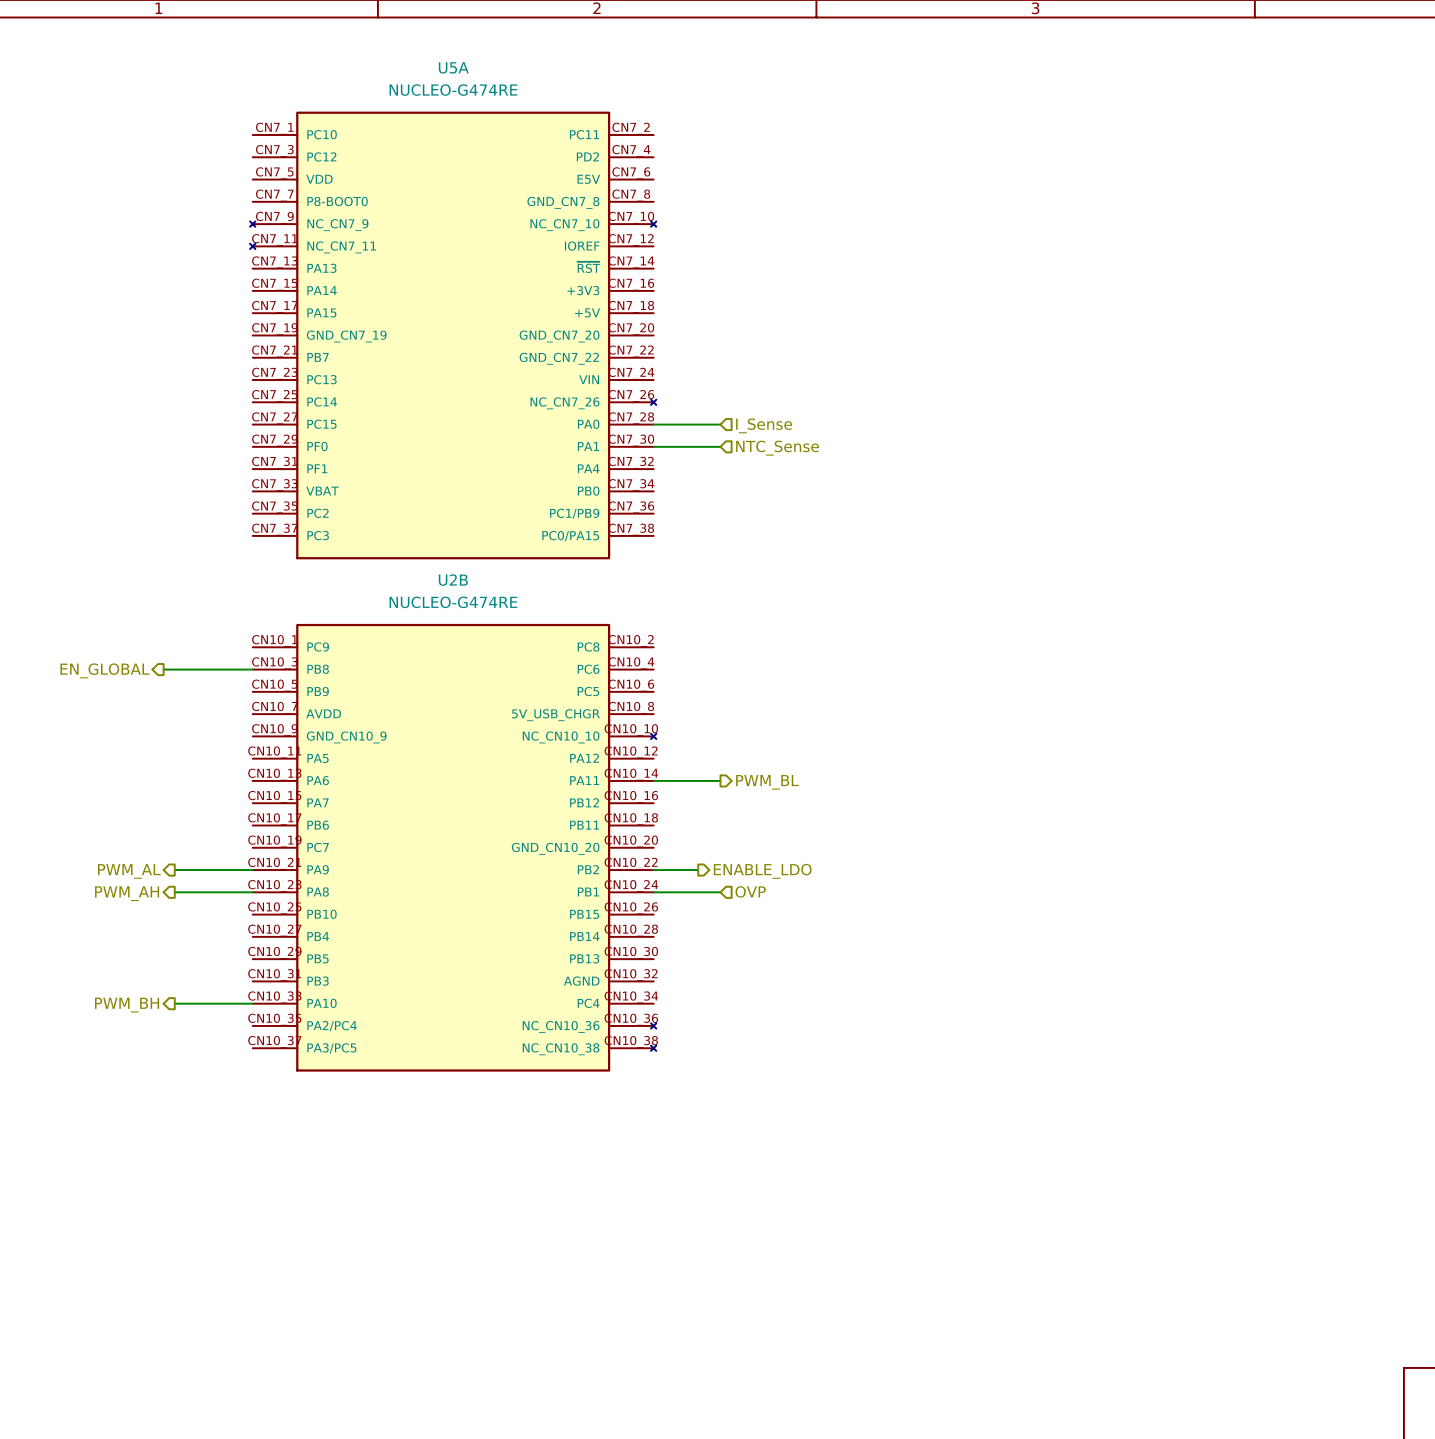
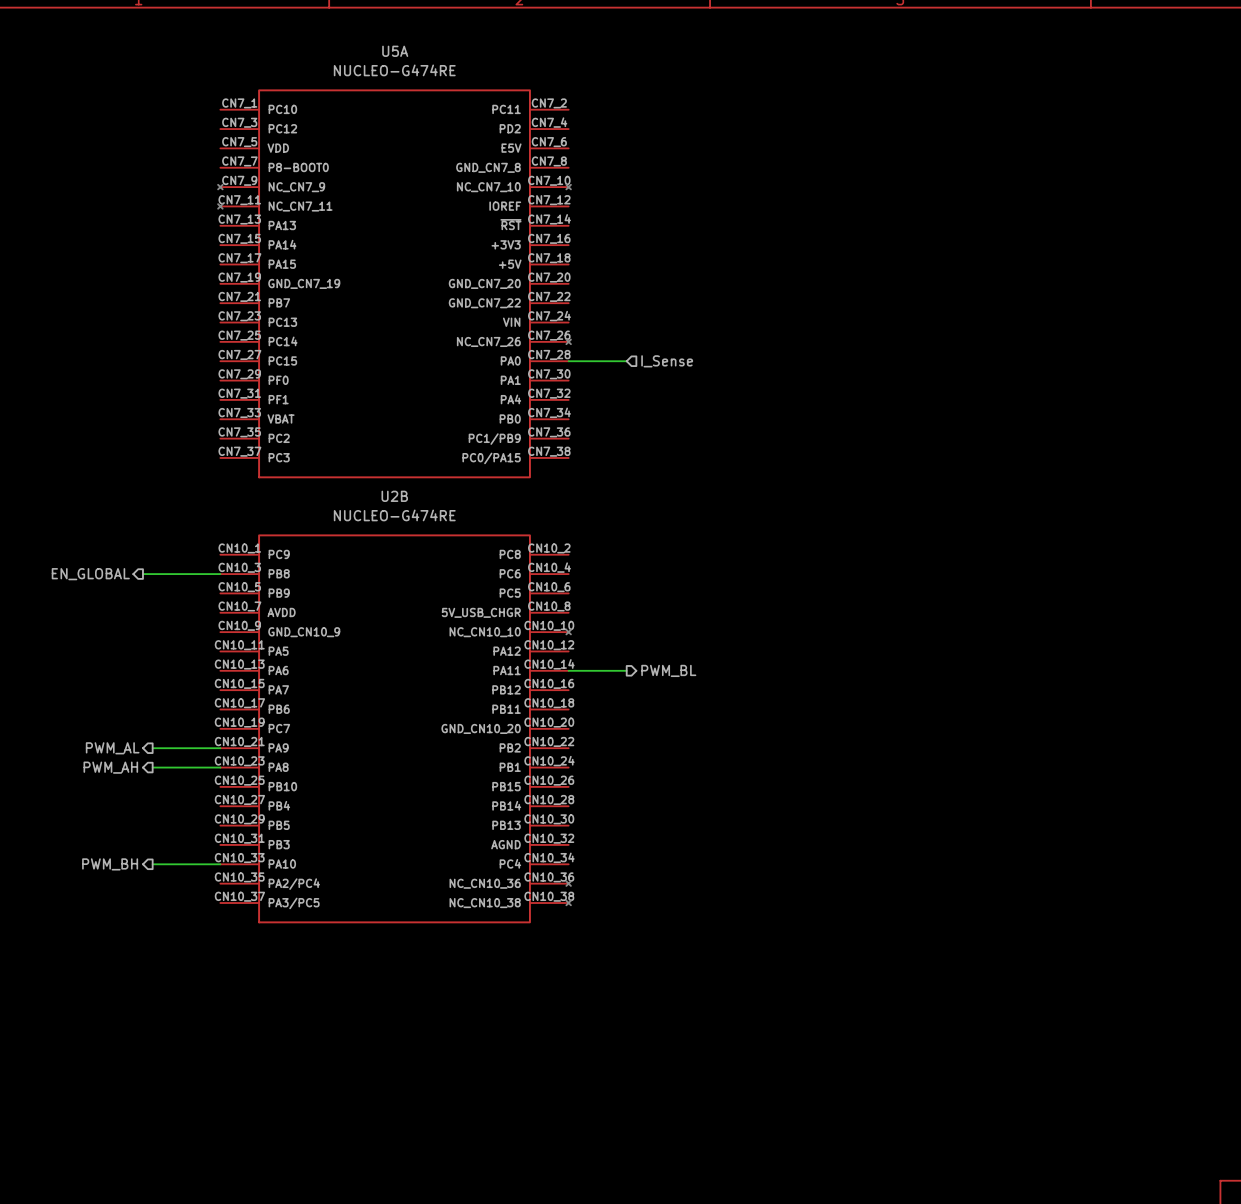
wire: (653, 446) (720, 446) -> none
hierarchical label: NTC_Sense (777, 448) -> none
wire: (653, 870) (698, 870) -> none
hierarchical label: ENABLE_LDO (762, 871) -> none
hierarchical label: OVP (750, 891) -> none
wire: (653, 892) (720, 892) -> none

